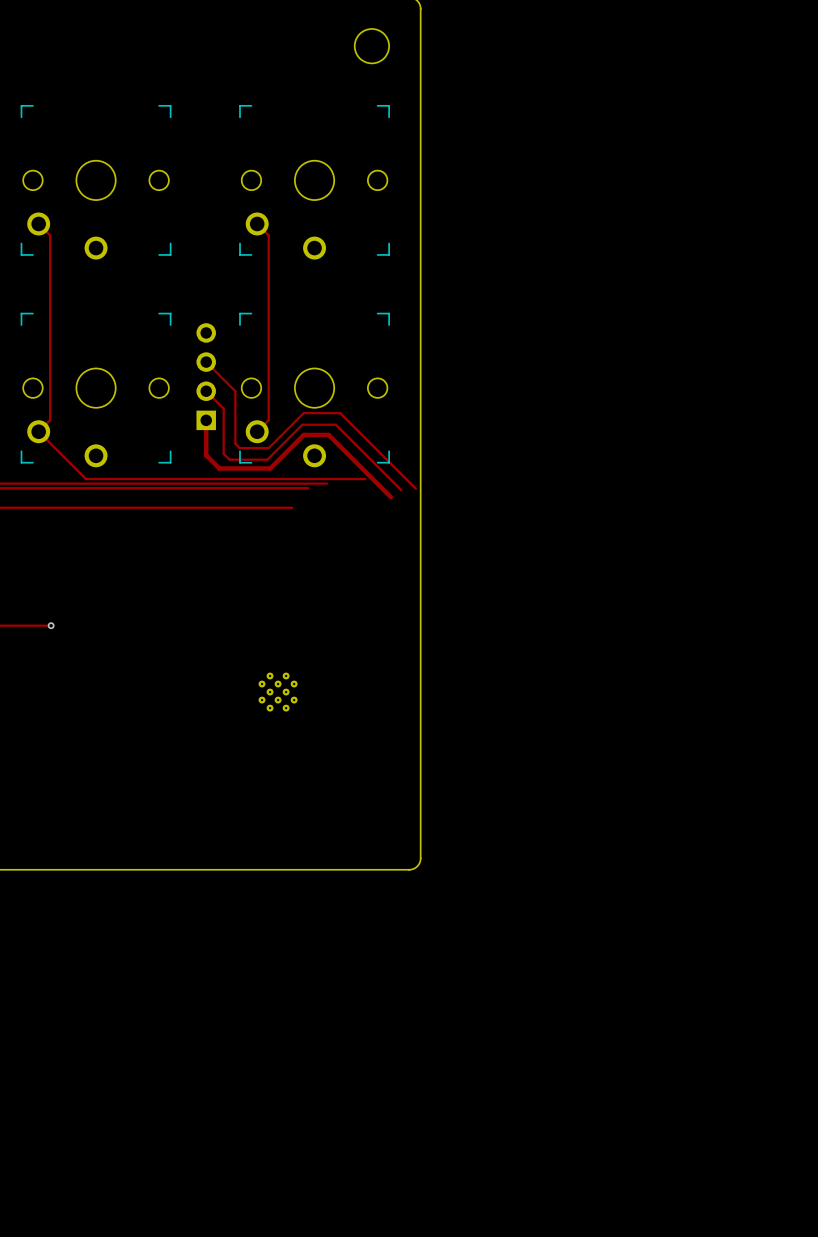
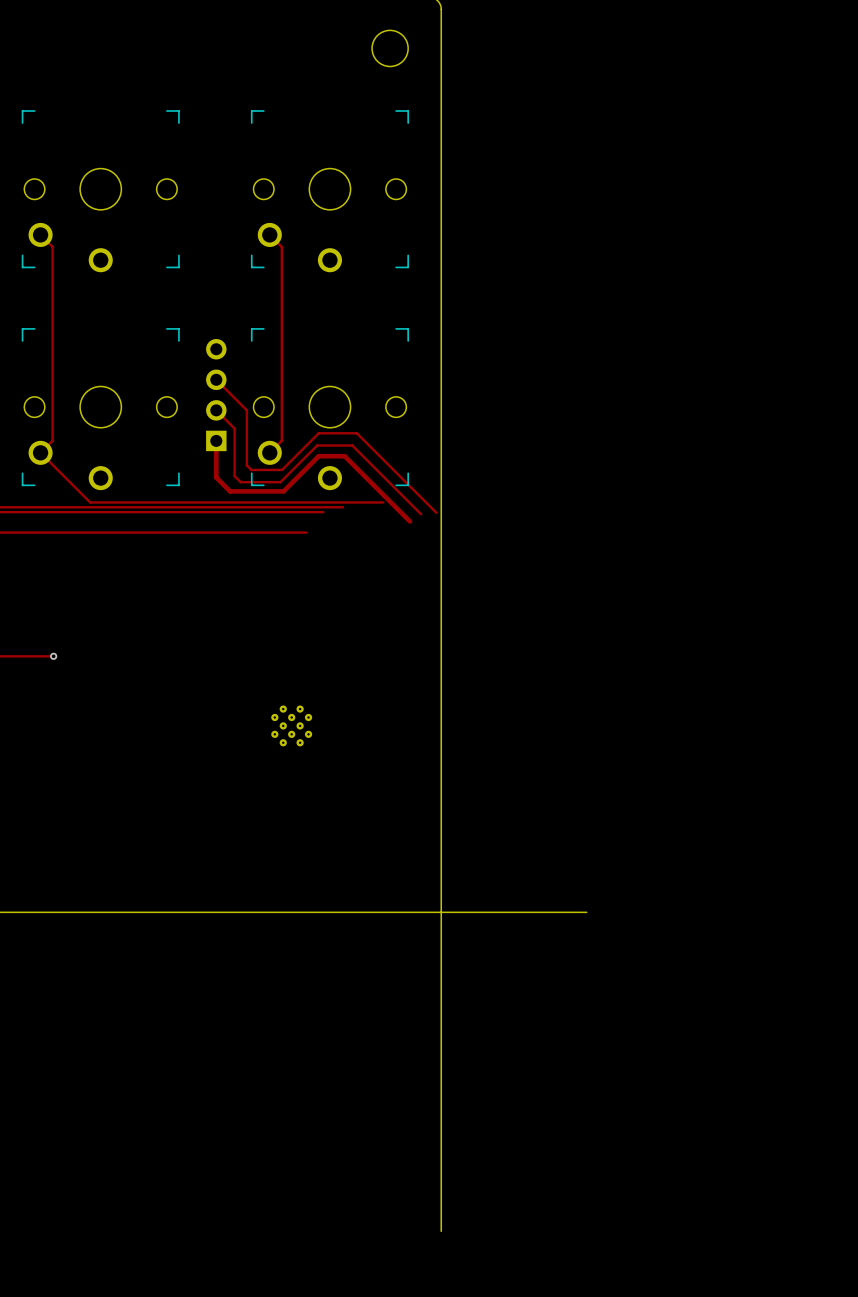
board edge: (420, 858) (417, 866) (409, 869) -> (586, 912) (429, 912)
board edge: none -> (441, 900) (441, 1231)

